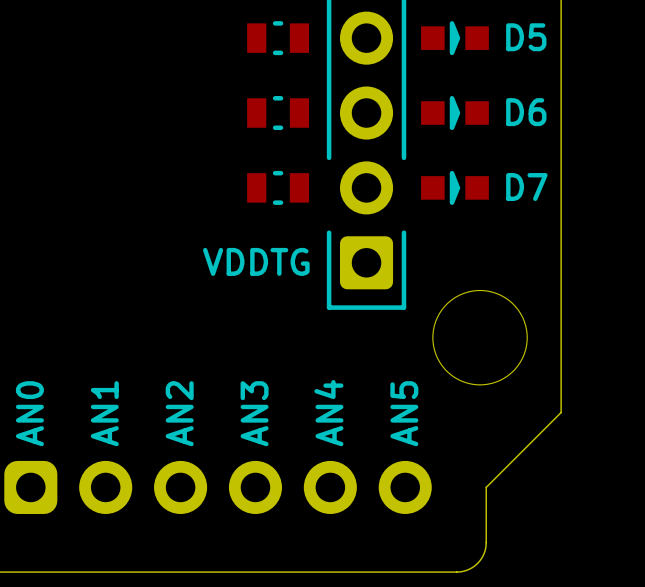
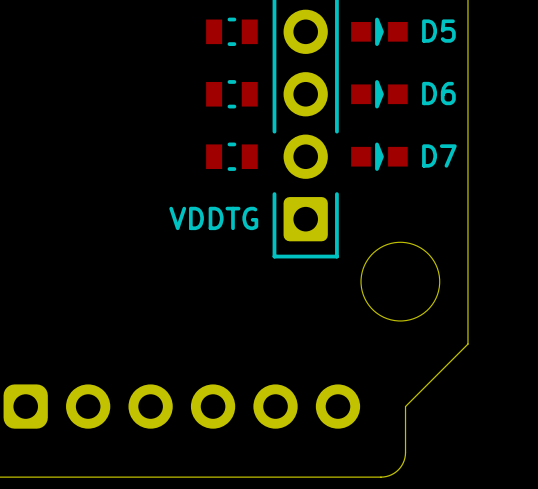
text: AN0 (29, 413) -> none
text: AN1 (104, 413) -> none
text: AN2 (179, 413) -> none
text: AN3 (254, 413) -> none
text: AN4 (328, 413) -> none
text: AN5 (404, 413) -> none

